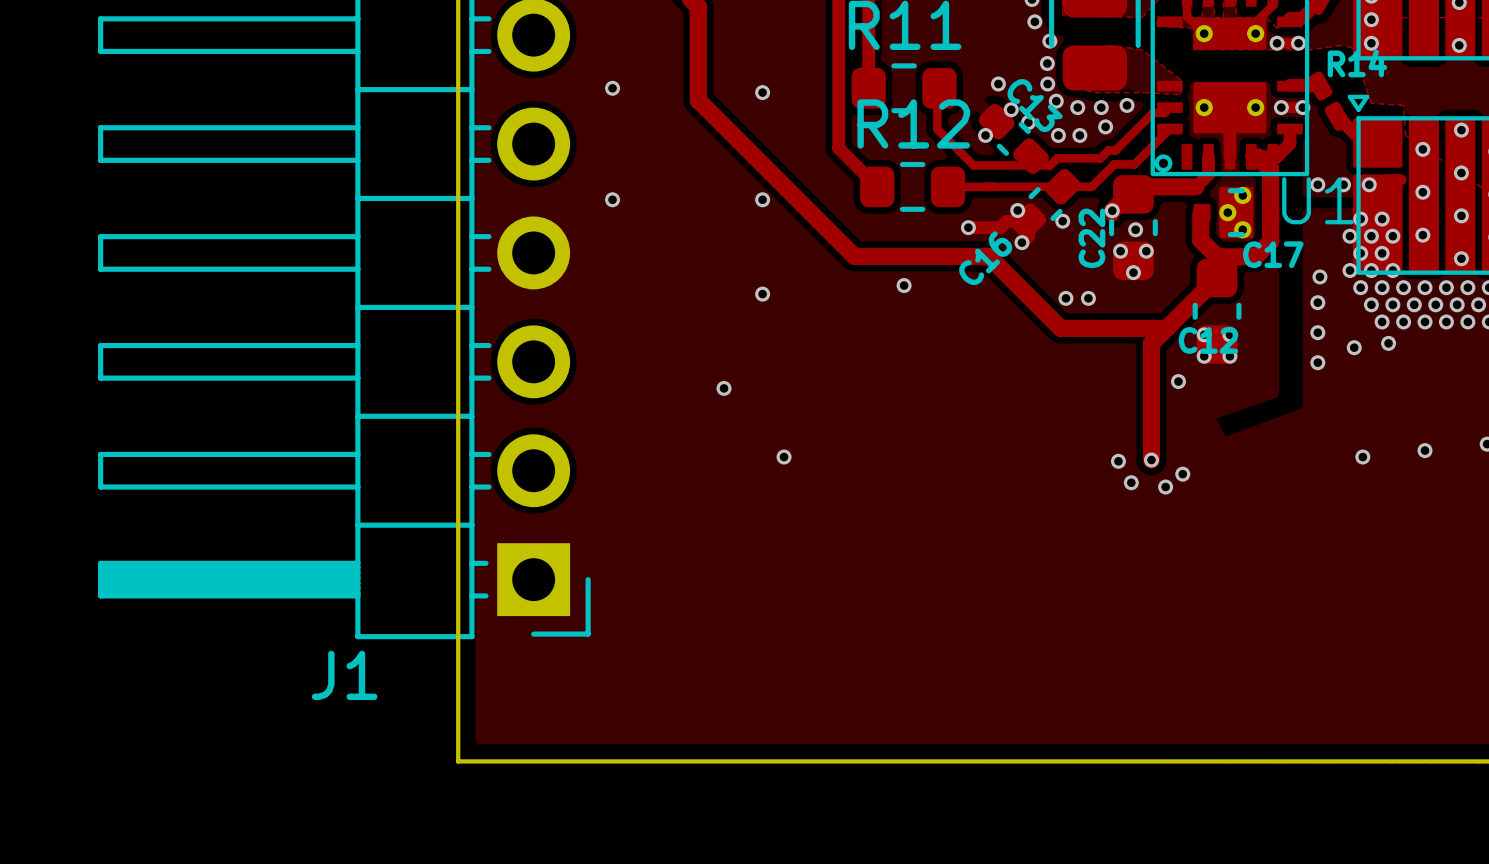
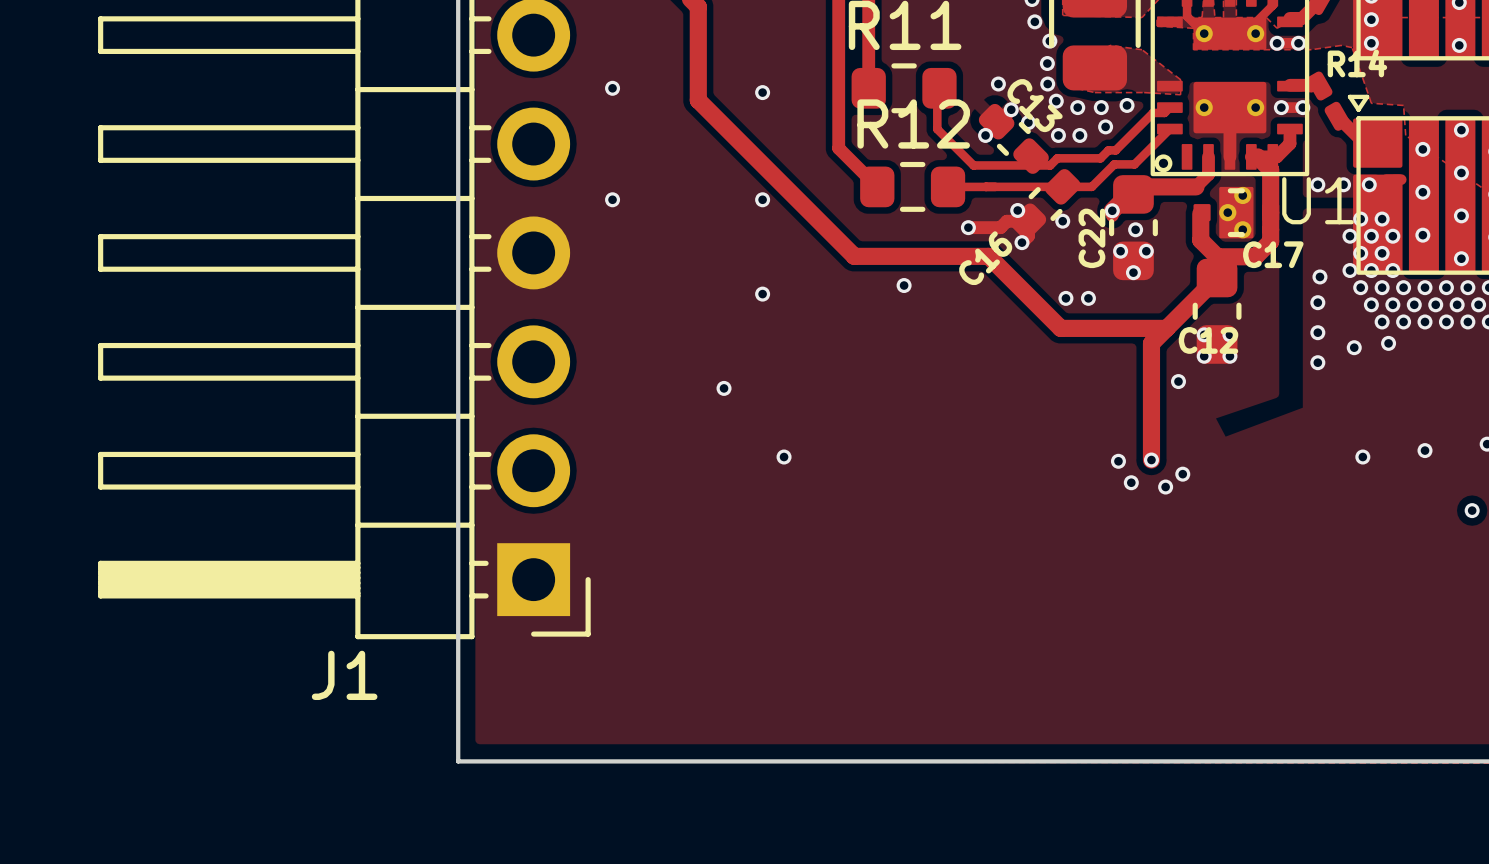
via: none -> (1472, 510)

